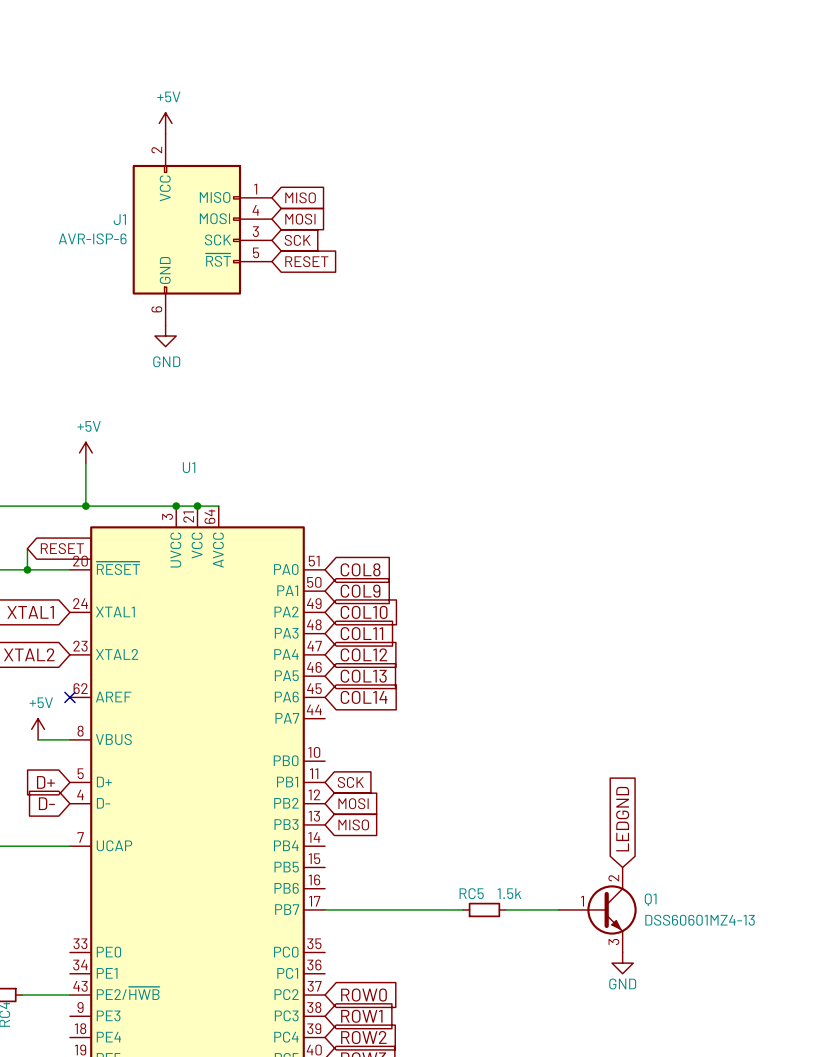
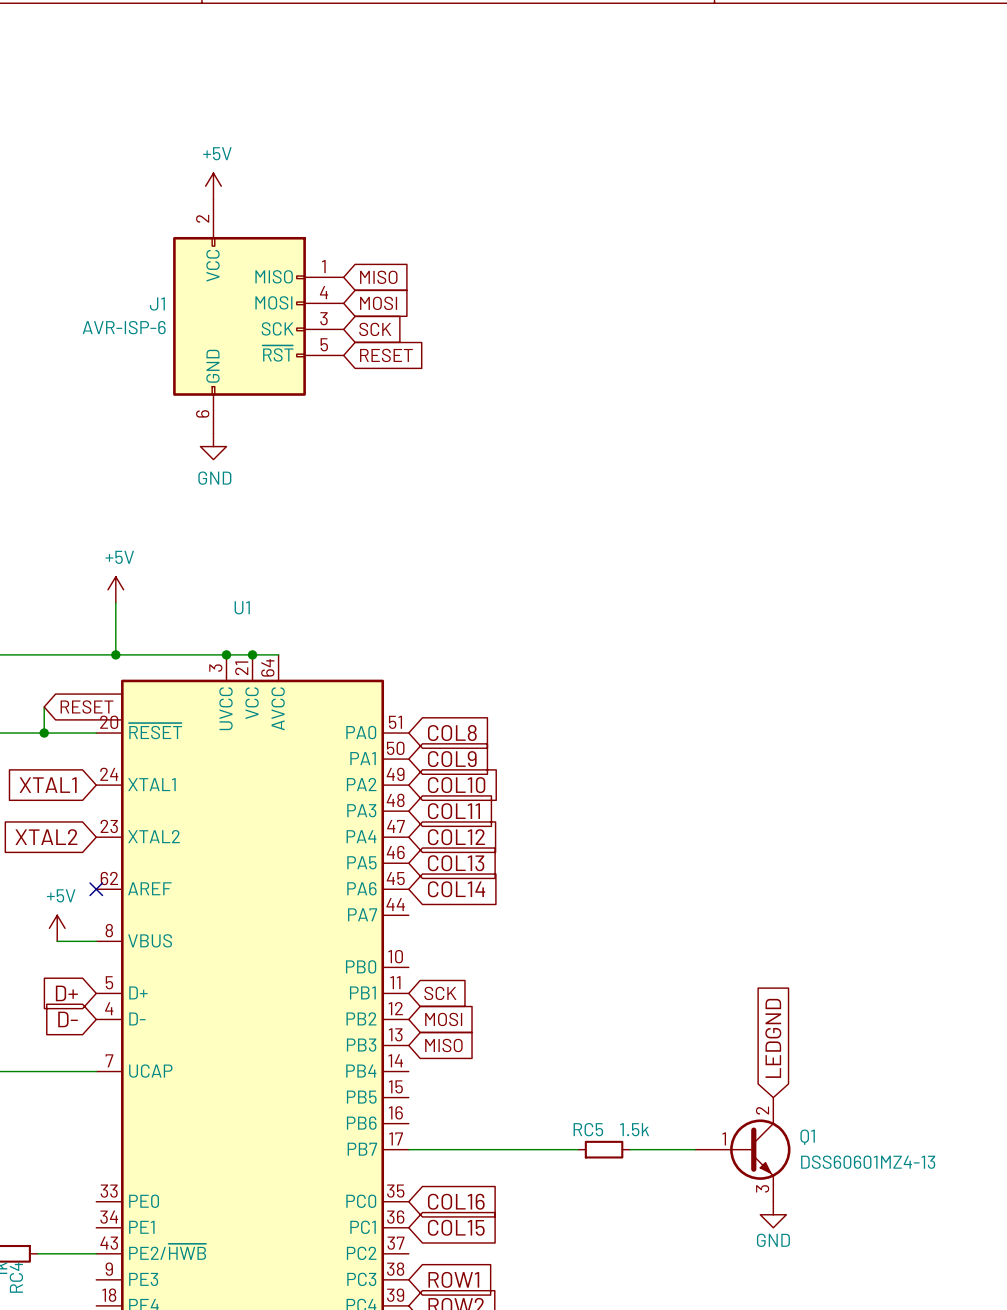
global label: none -> COL16 (456, 1201)
global label: none -> COL15 (456, 1227)
global label: ROW0 (363, 995) -> none

